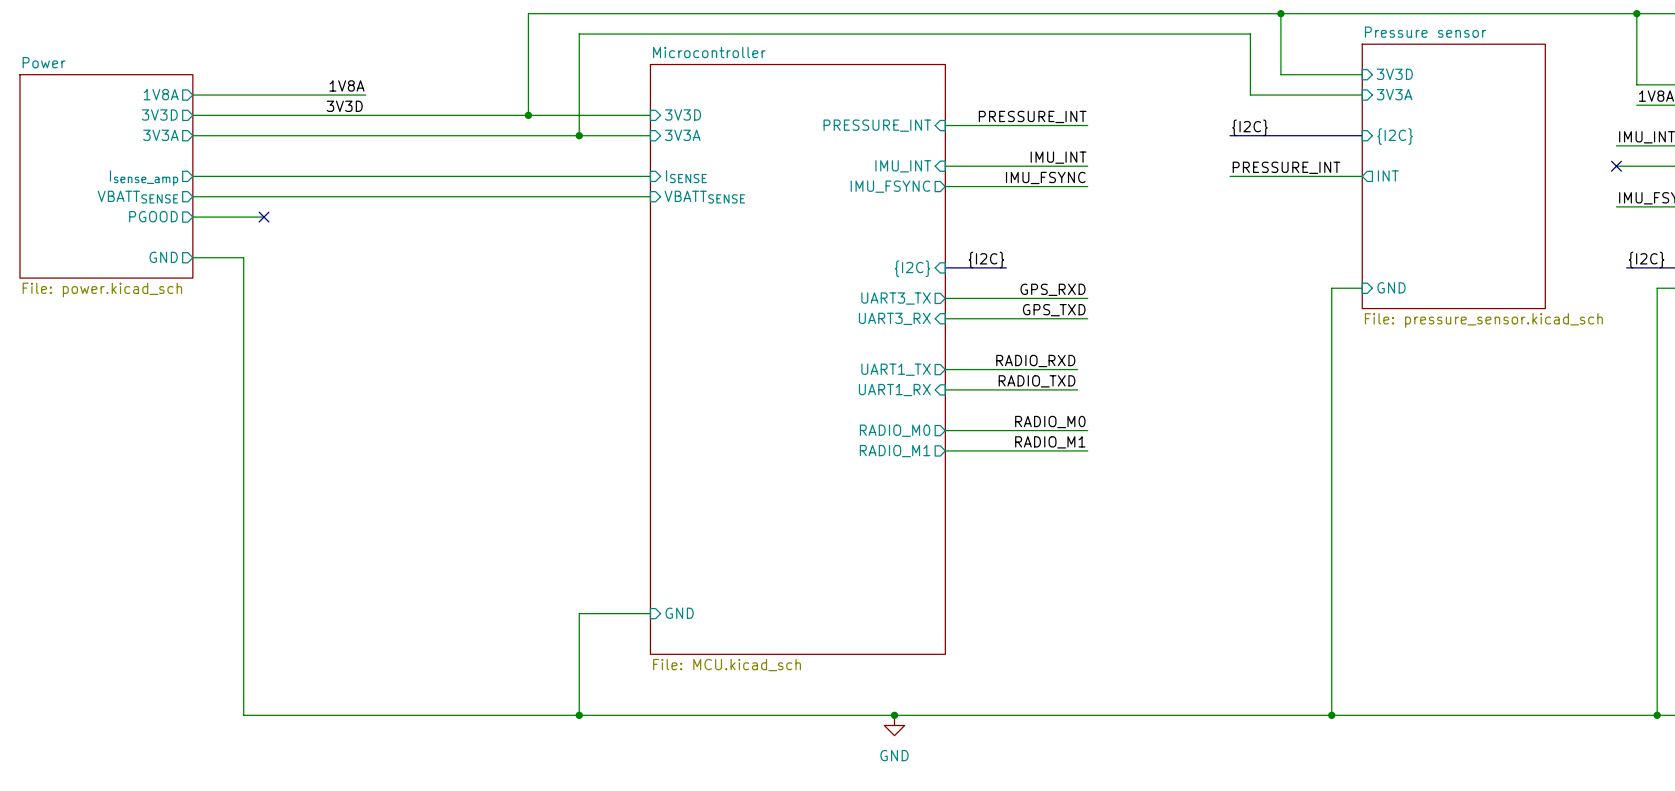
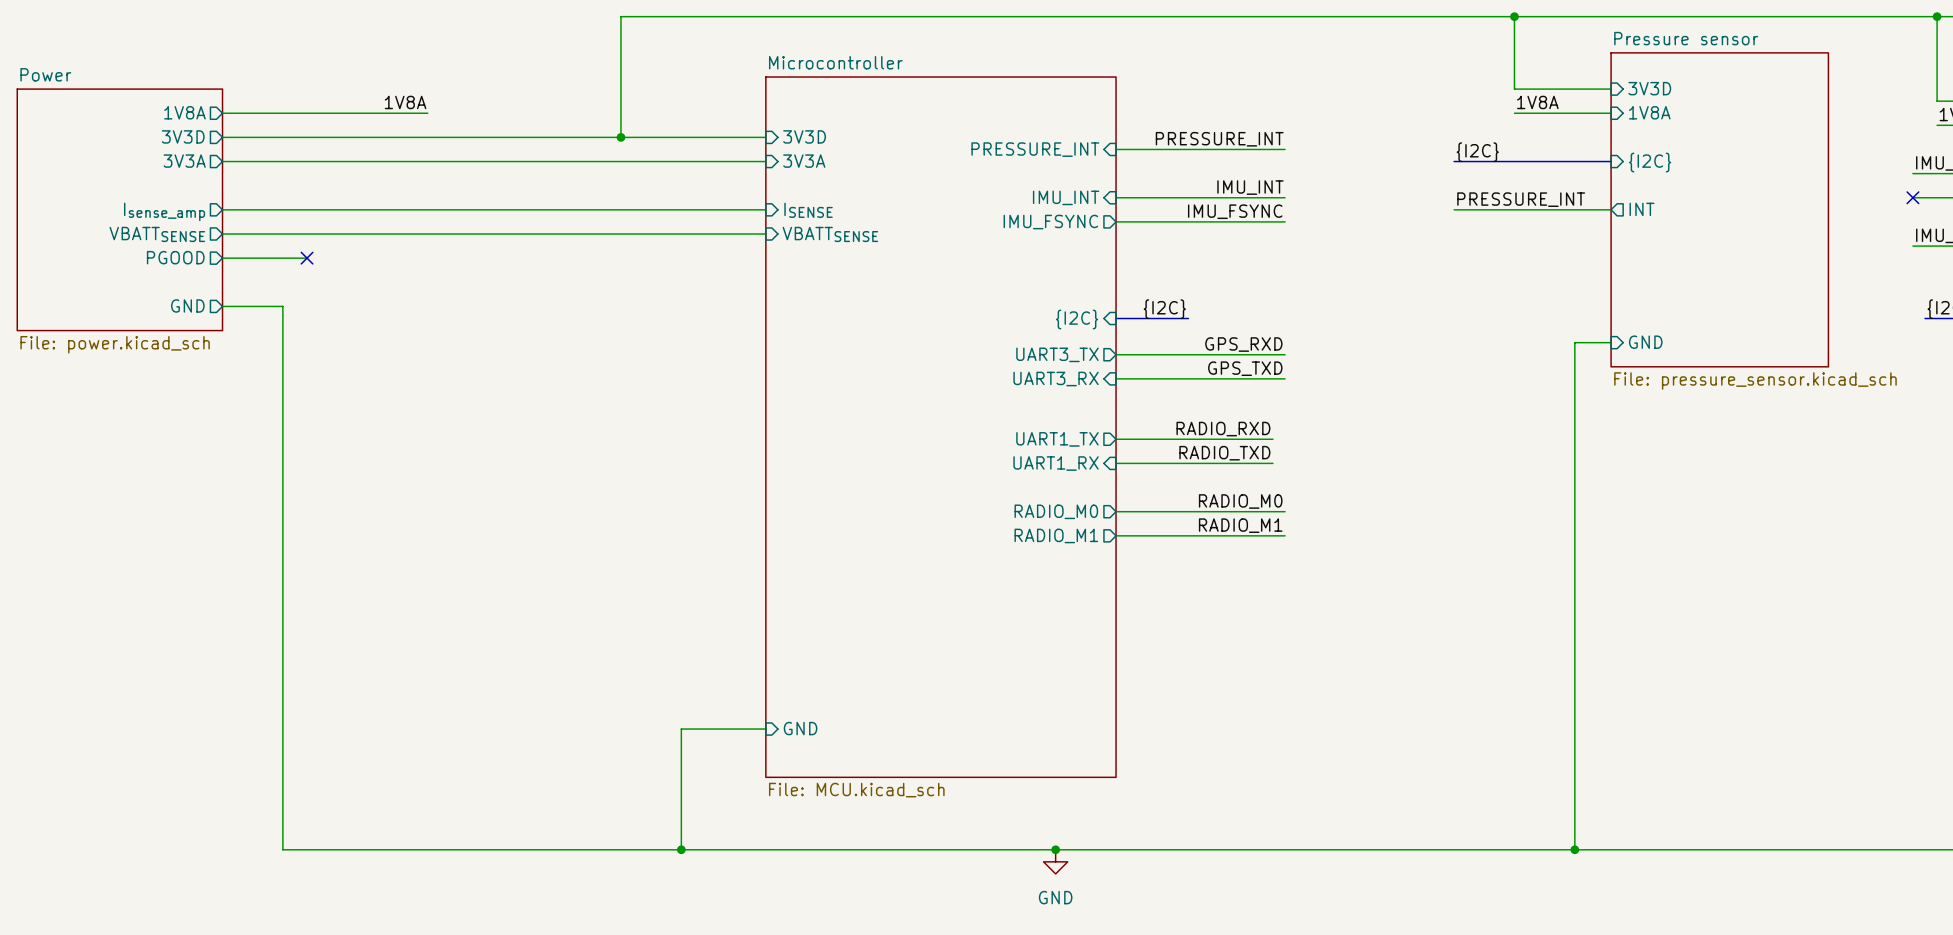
label: none -> 1V8A (1537, 102)
sheet pin: 3V3A (1394, 94) -> 1V8A (1649, 112)
wire: (1280, 95) (1250, 95) (1250, 34) (579, 34) (579, 135) -> none
label: 3V3D (344, 106) -> none
junction: (579, 135) -> none

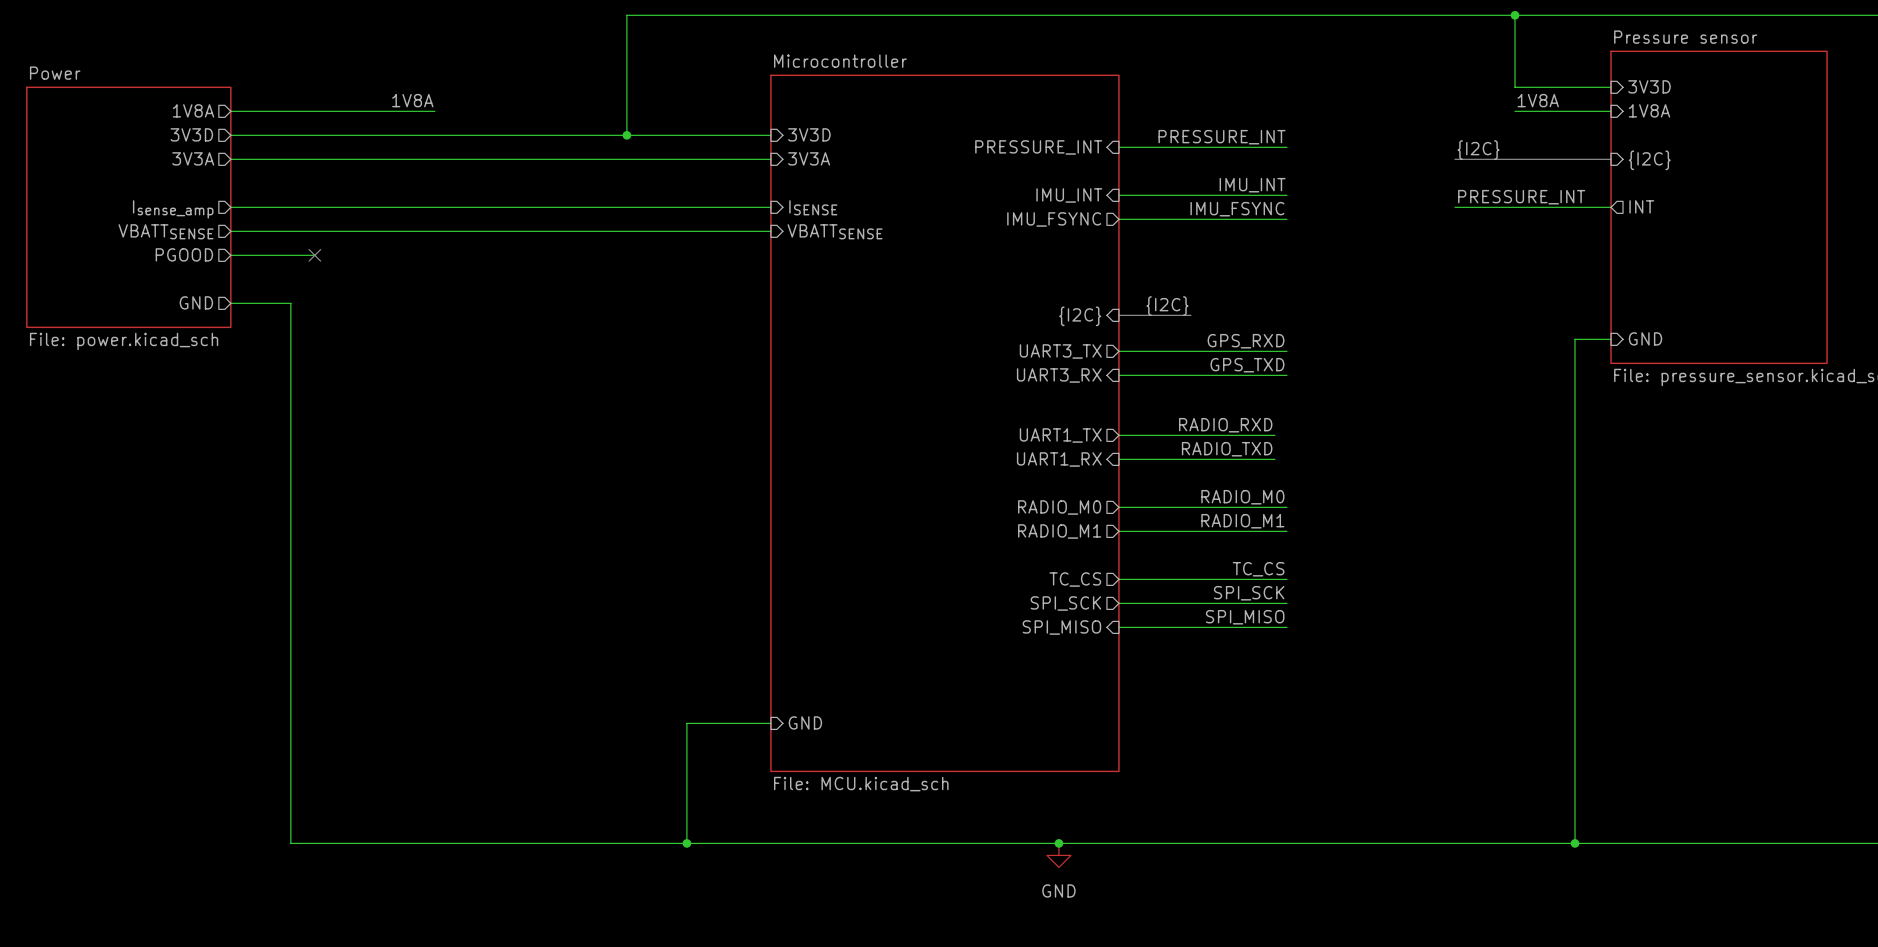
label: none -> TC_CS (1258, 569)
sheet pin: none -> TC_CS (1075, 579)
wire: none -> (1118, 579) (1286, 579)
label: none -> SPI_SCK (1249, 593)
sheet pin: none -> SPI_SCK (1065, 603)
wire: none -> (1118, 603) (1286, 603)
label: none -> SPI_MISO (1245, 617)
sheet pin: none -> SPI_MISO (1061, 627)
wire: none -> (1118, 627) (1286, 627)

